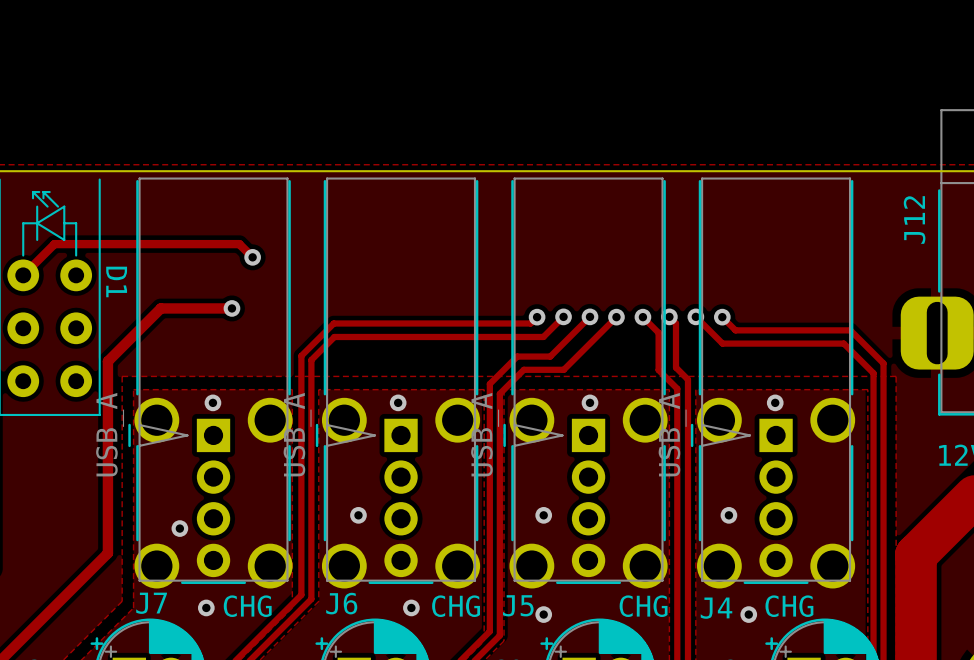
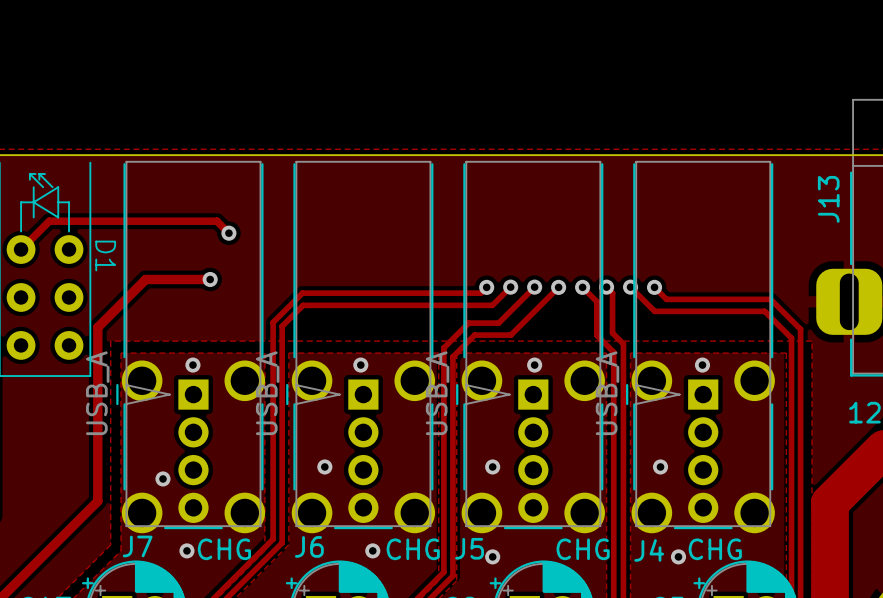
J12 name: J12 (914, 219) -> J13 (828, 199)

